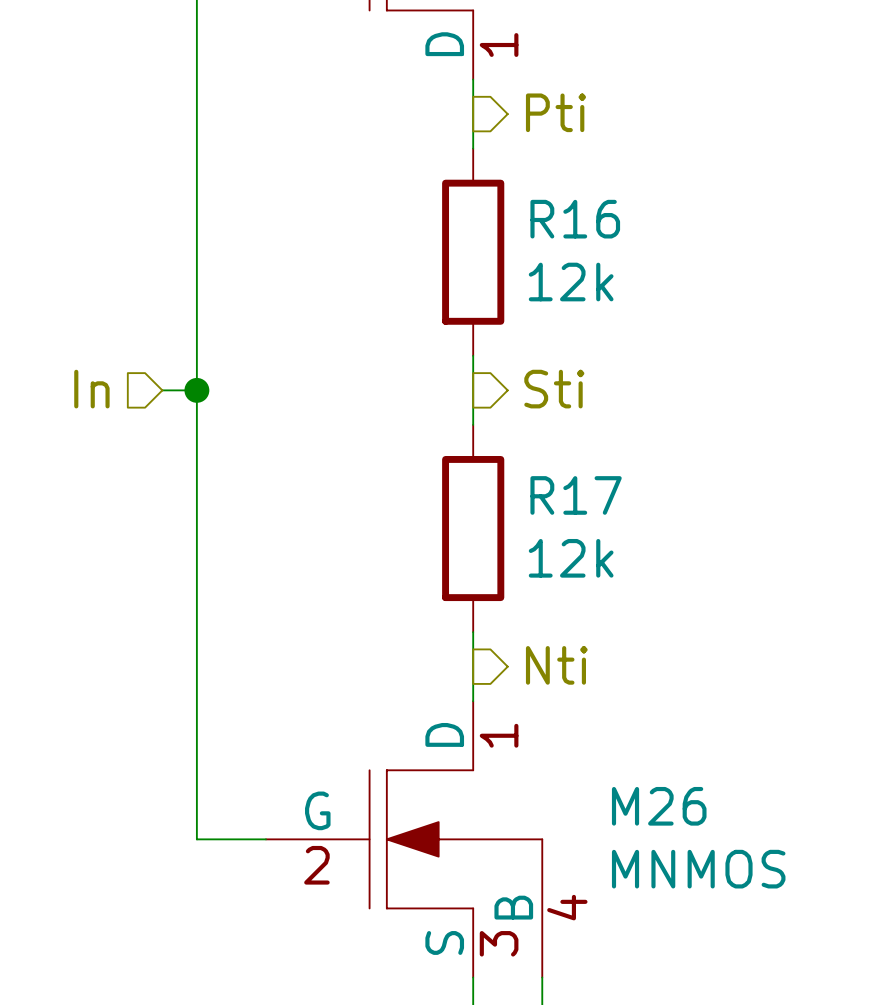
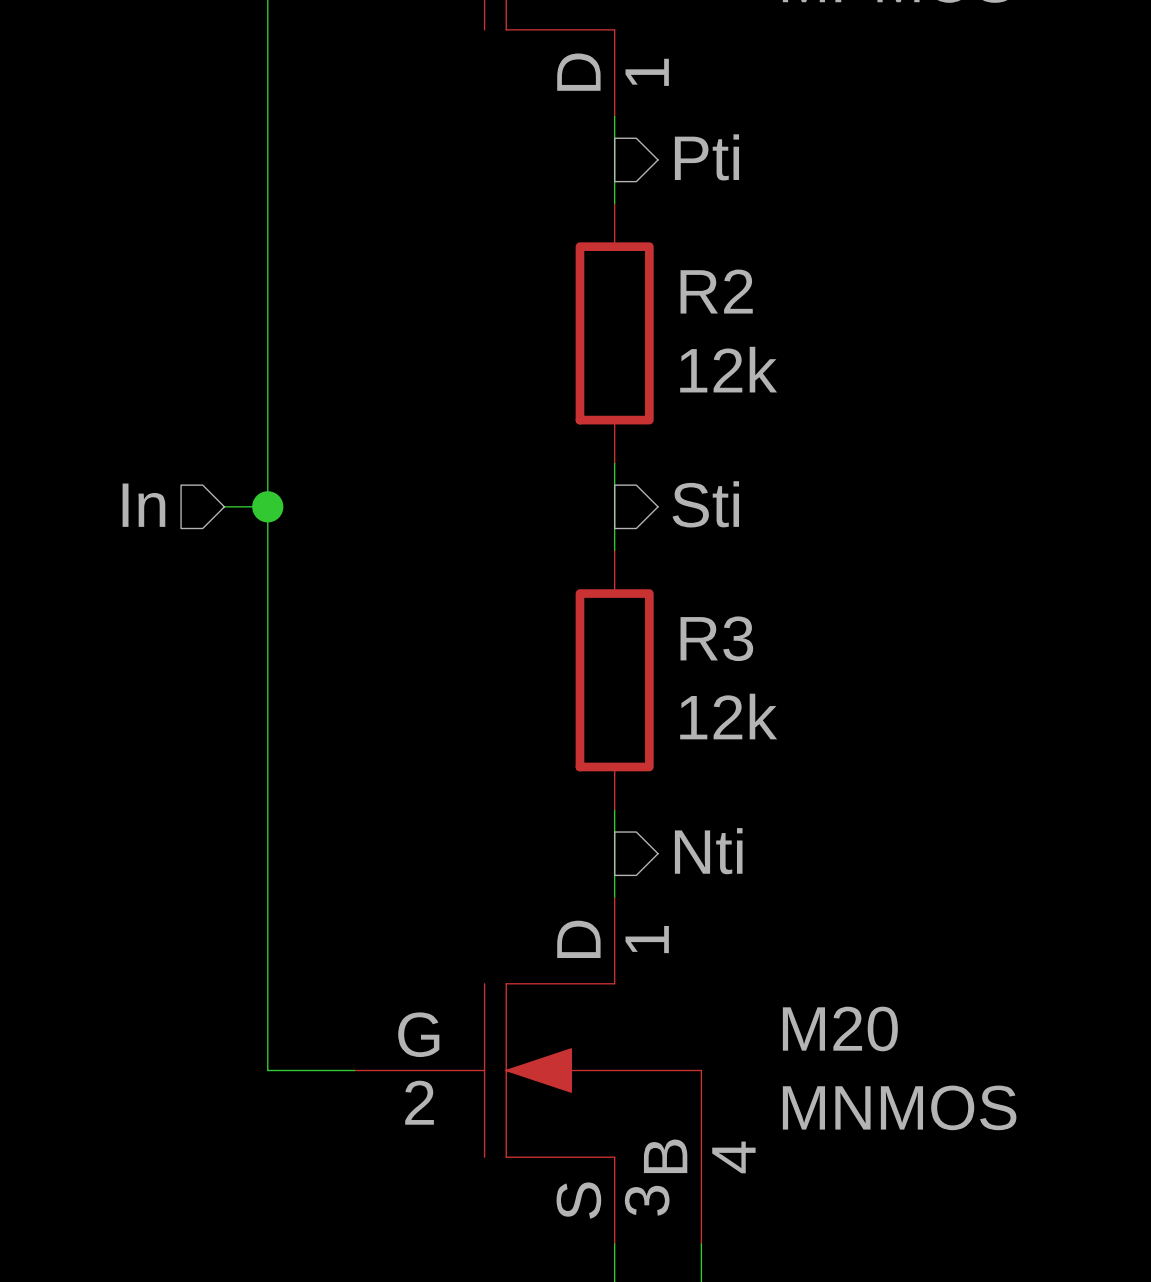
R16 name: R16 (575, 219) -> R2 (716, 291)
R17 name: R17 (576, 495) -> R3 (716, 638)
M26 name: M26 (659, 806) -> M20 (840, 1028)

